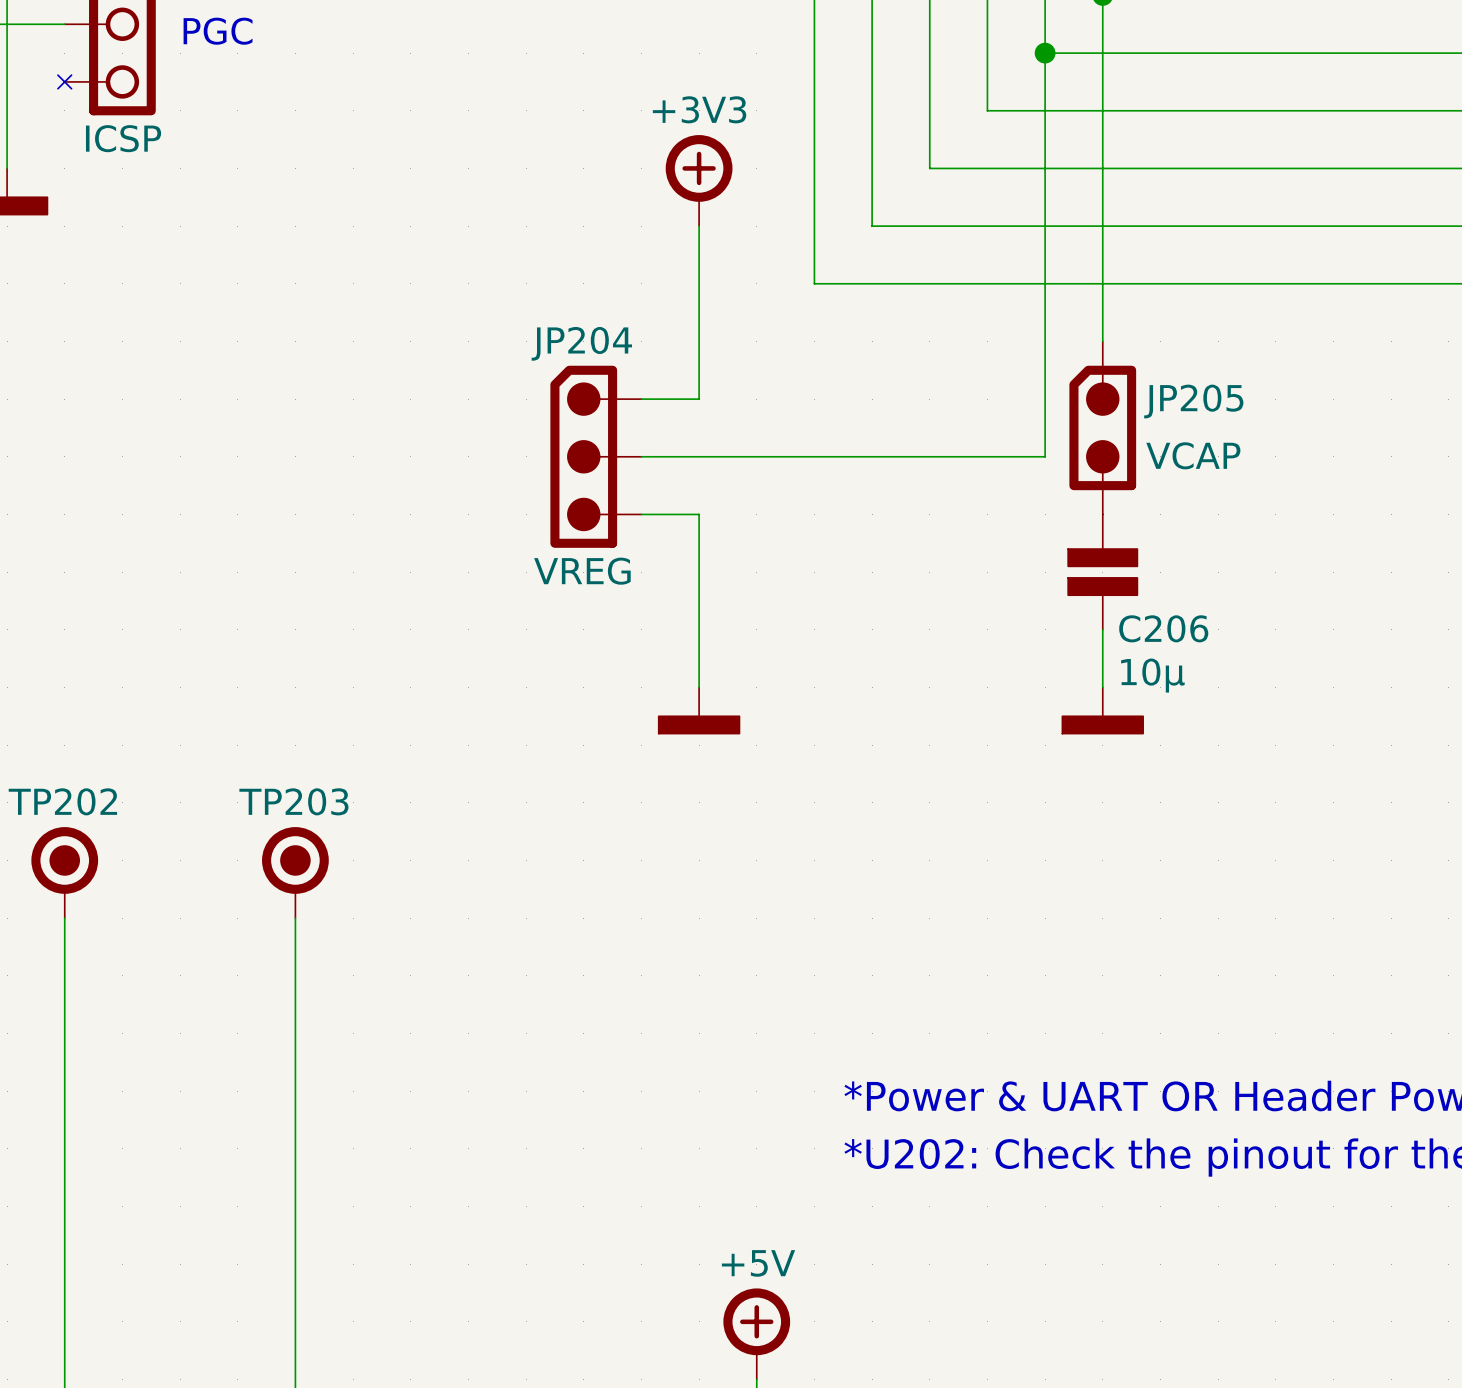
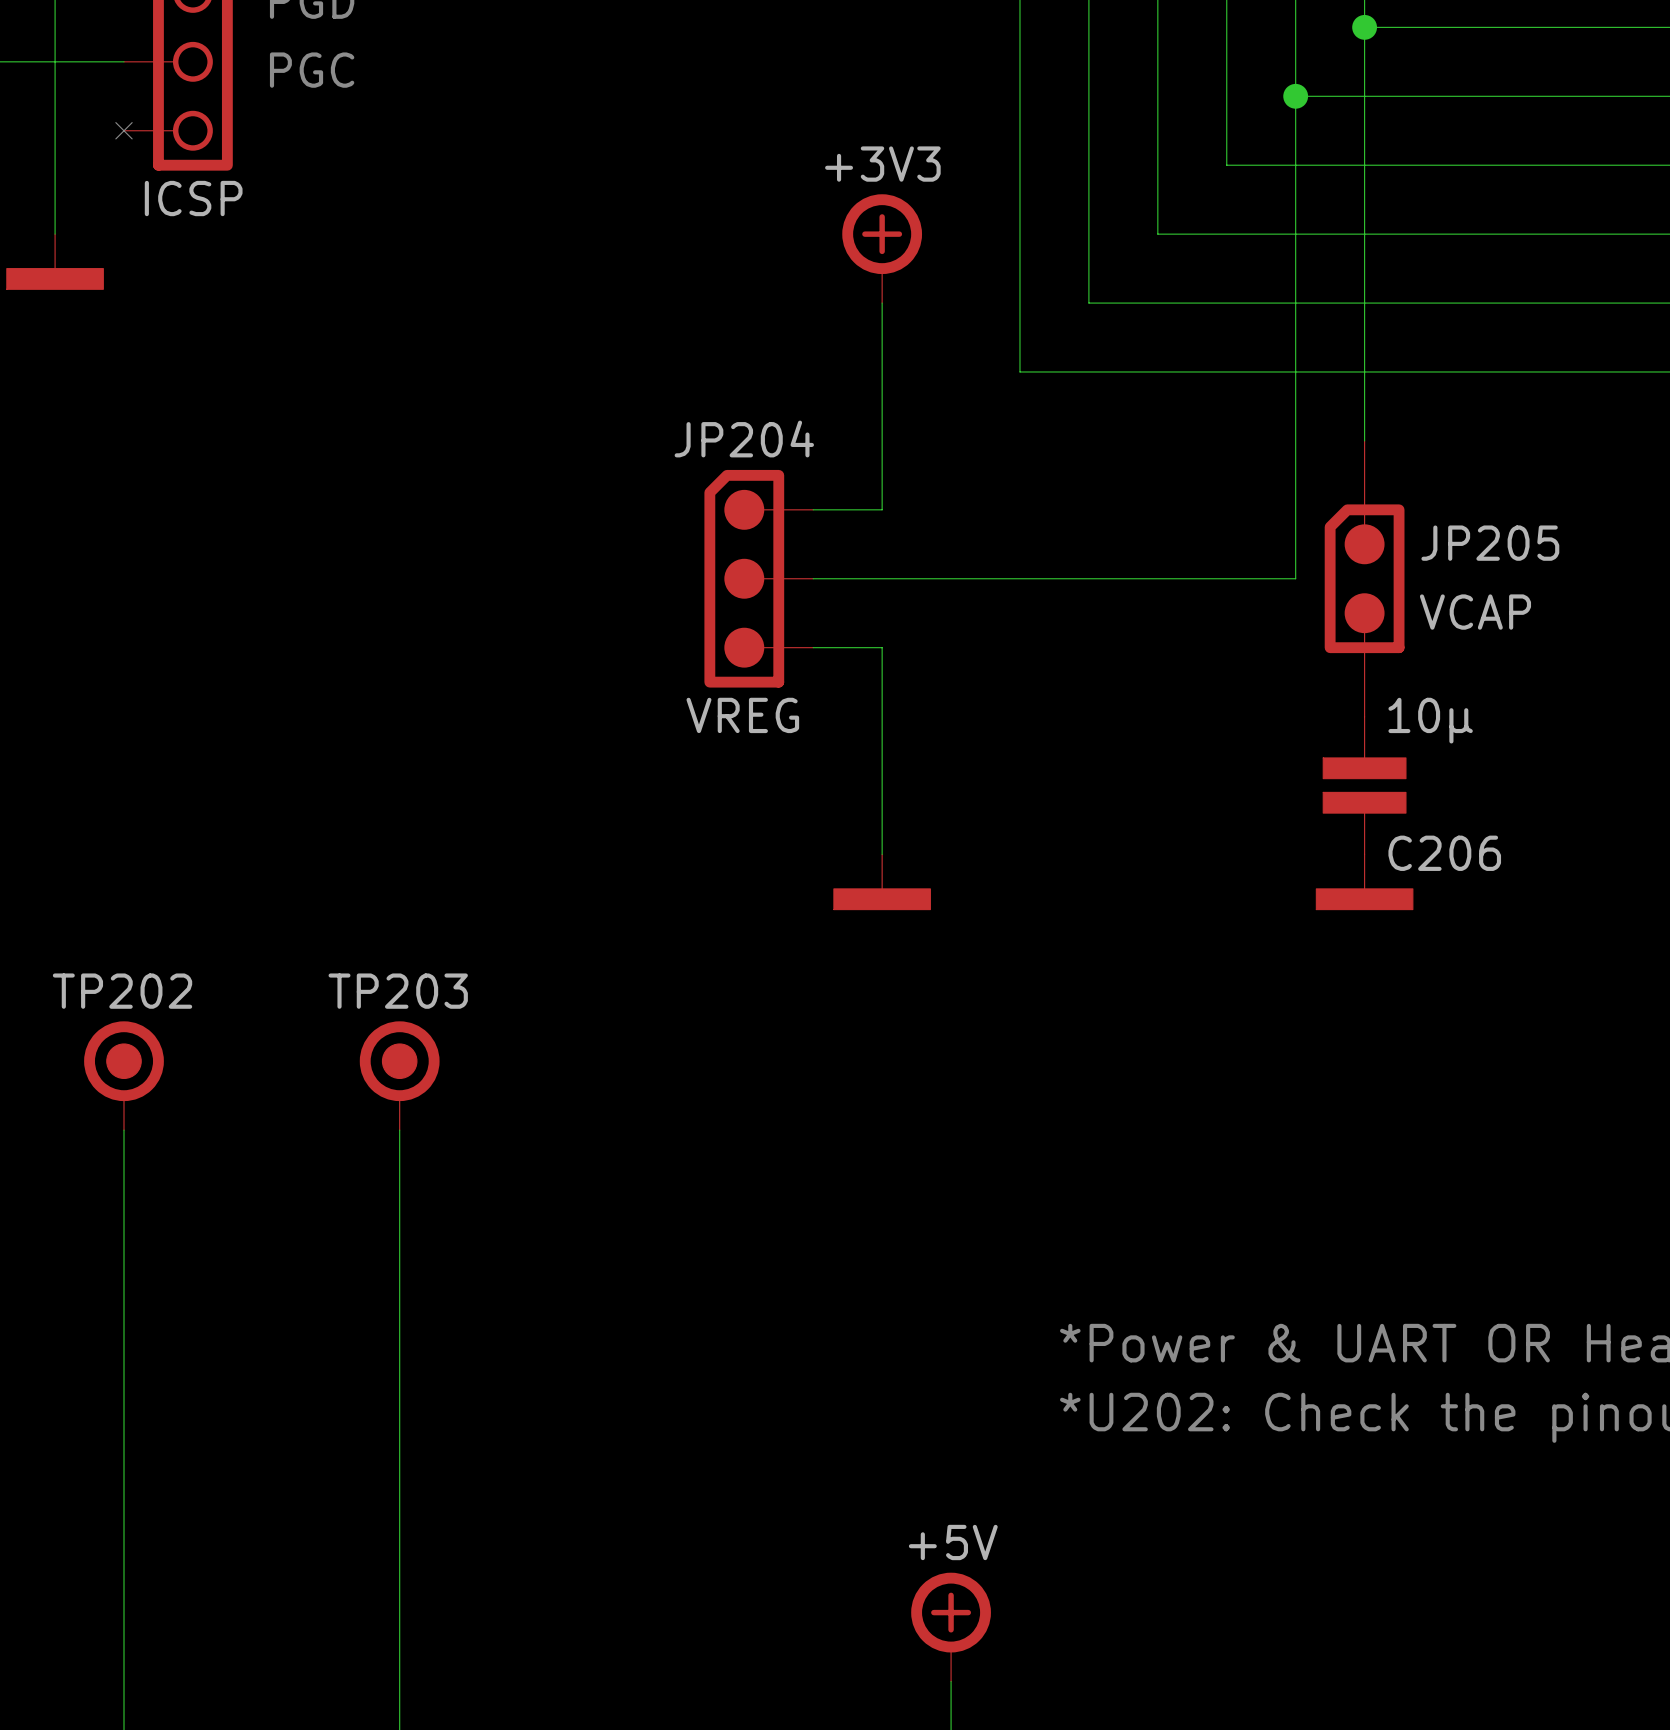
JP205 symbol: [1069, 341, 1137, 515] -> [1324, 440, 1405, 717]
C206 position: (1102, 572) -> (1364, 785)
C206 value position: 10µ (1152, 675) -> 10µ (1430, 720)

